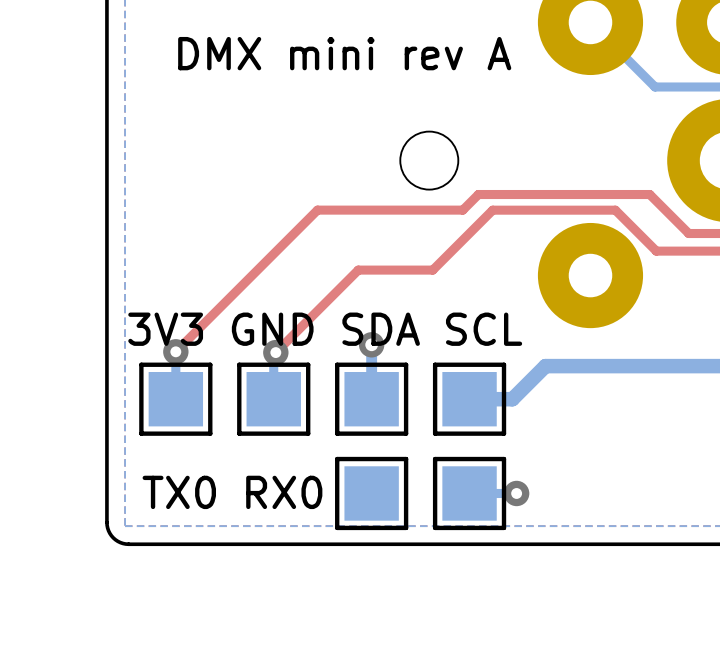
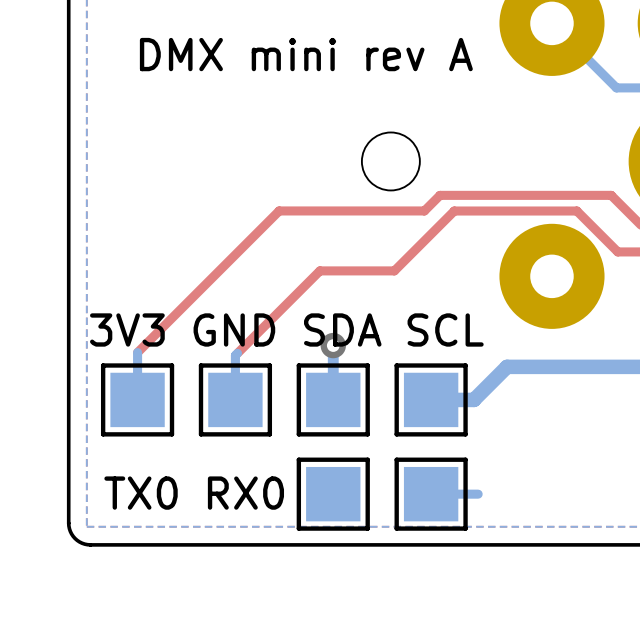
via: (175, 351) -> none
via: (275, 352) -> none
via: (516, 493) -> none

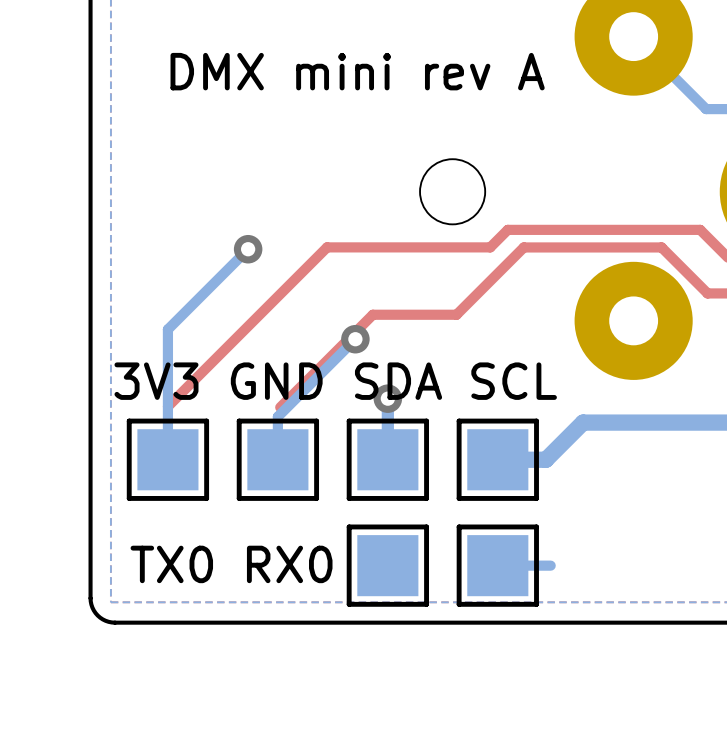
bottom track: none -> (248, 249) (167, 329) (167, 406)
via: none -> (248, 249)
via: none -> (355, 339)
bottom track: (237, 353) (235, 355) (235, 361) -> (355, 339) (277, 416)

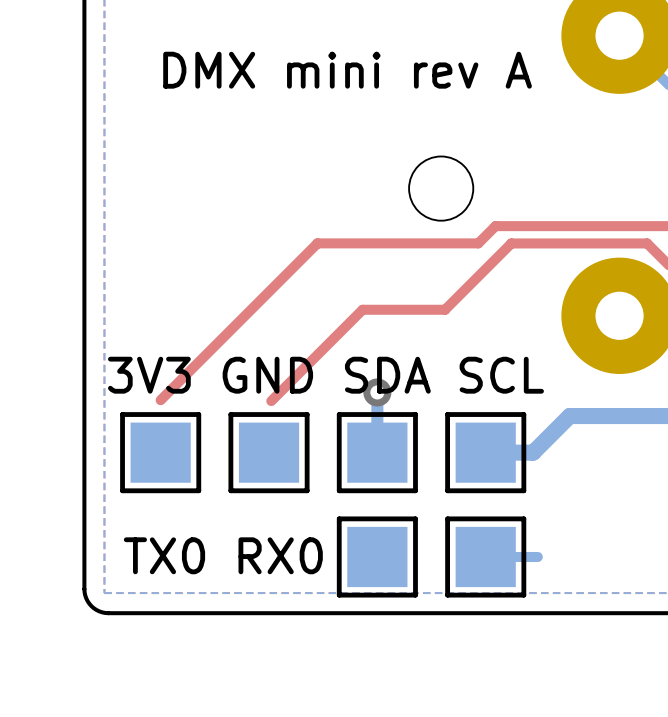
bottom track: (248, 249) (167, 329) (167, 459) -> none
via: (248, 249) -> none
bottom track: (355, 339) (277, 416) (277, 459) -> none
via: (355, 339) -> none

